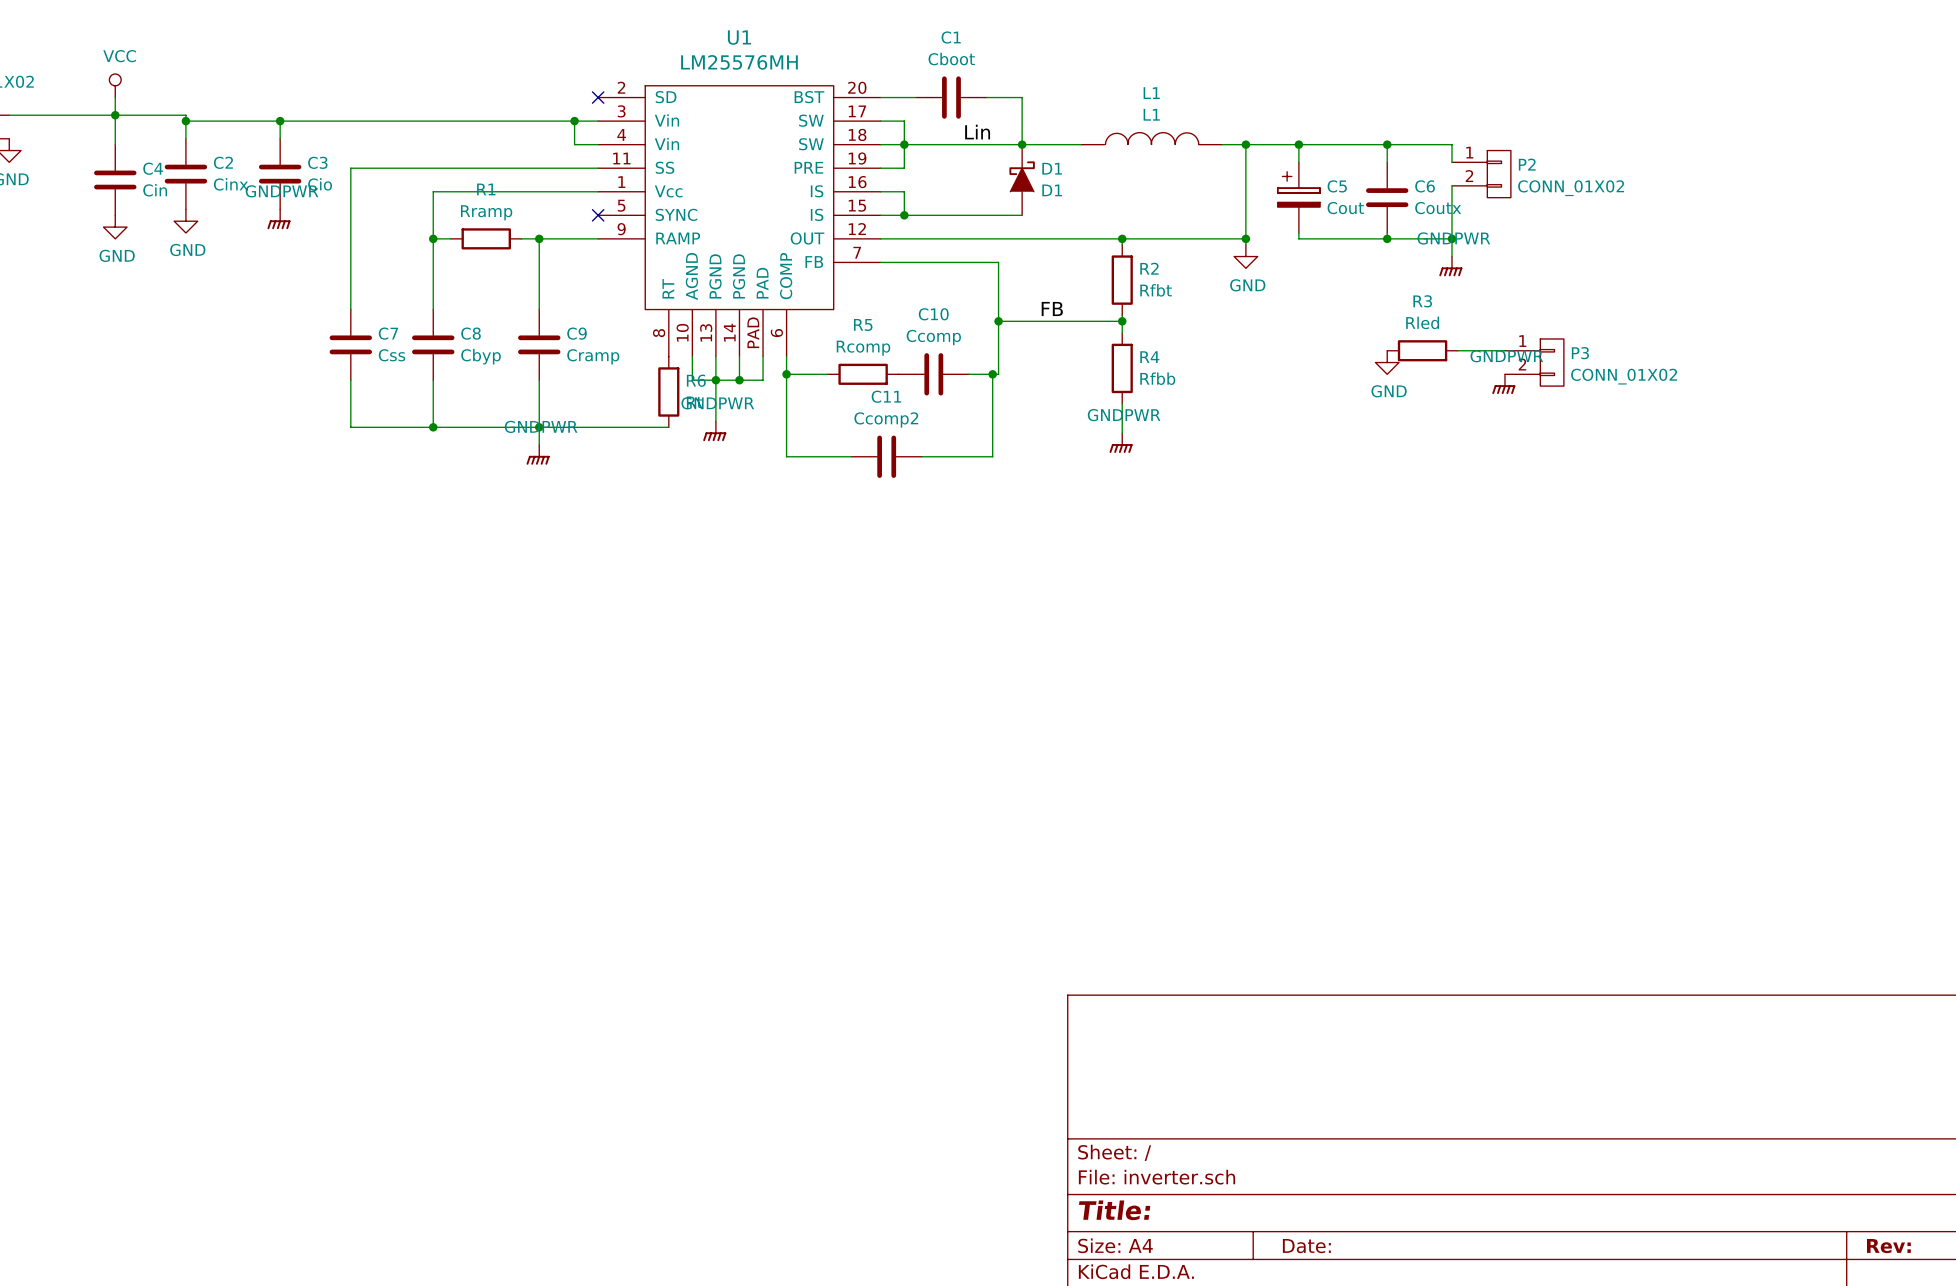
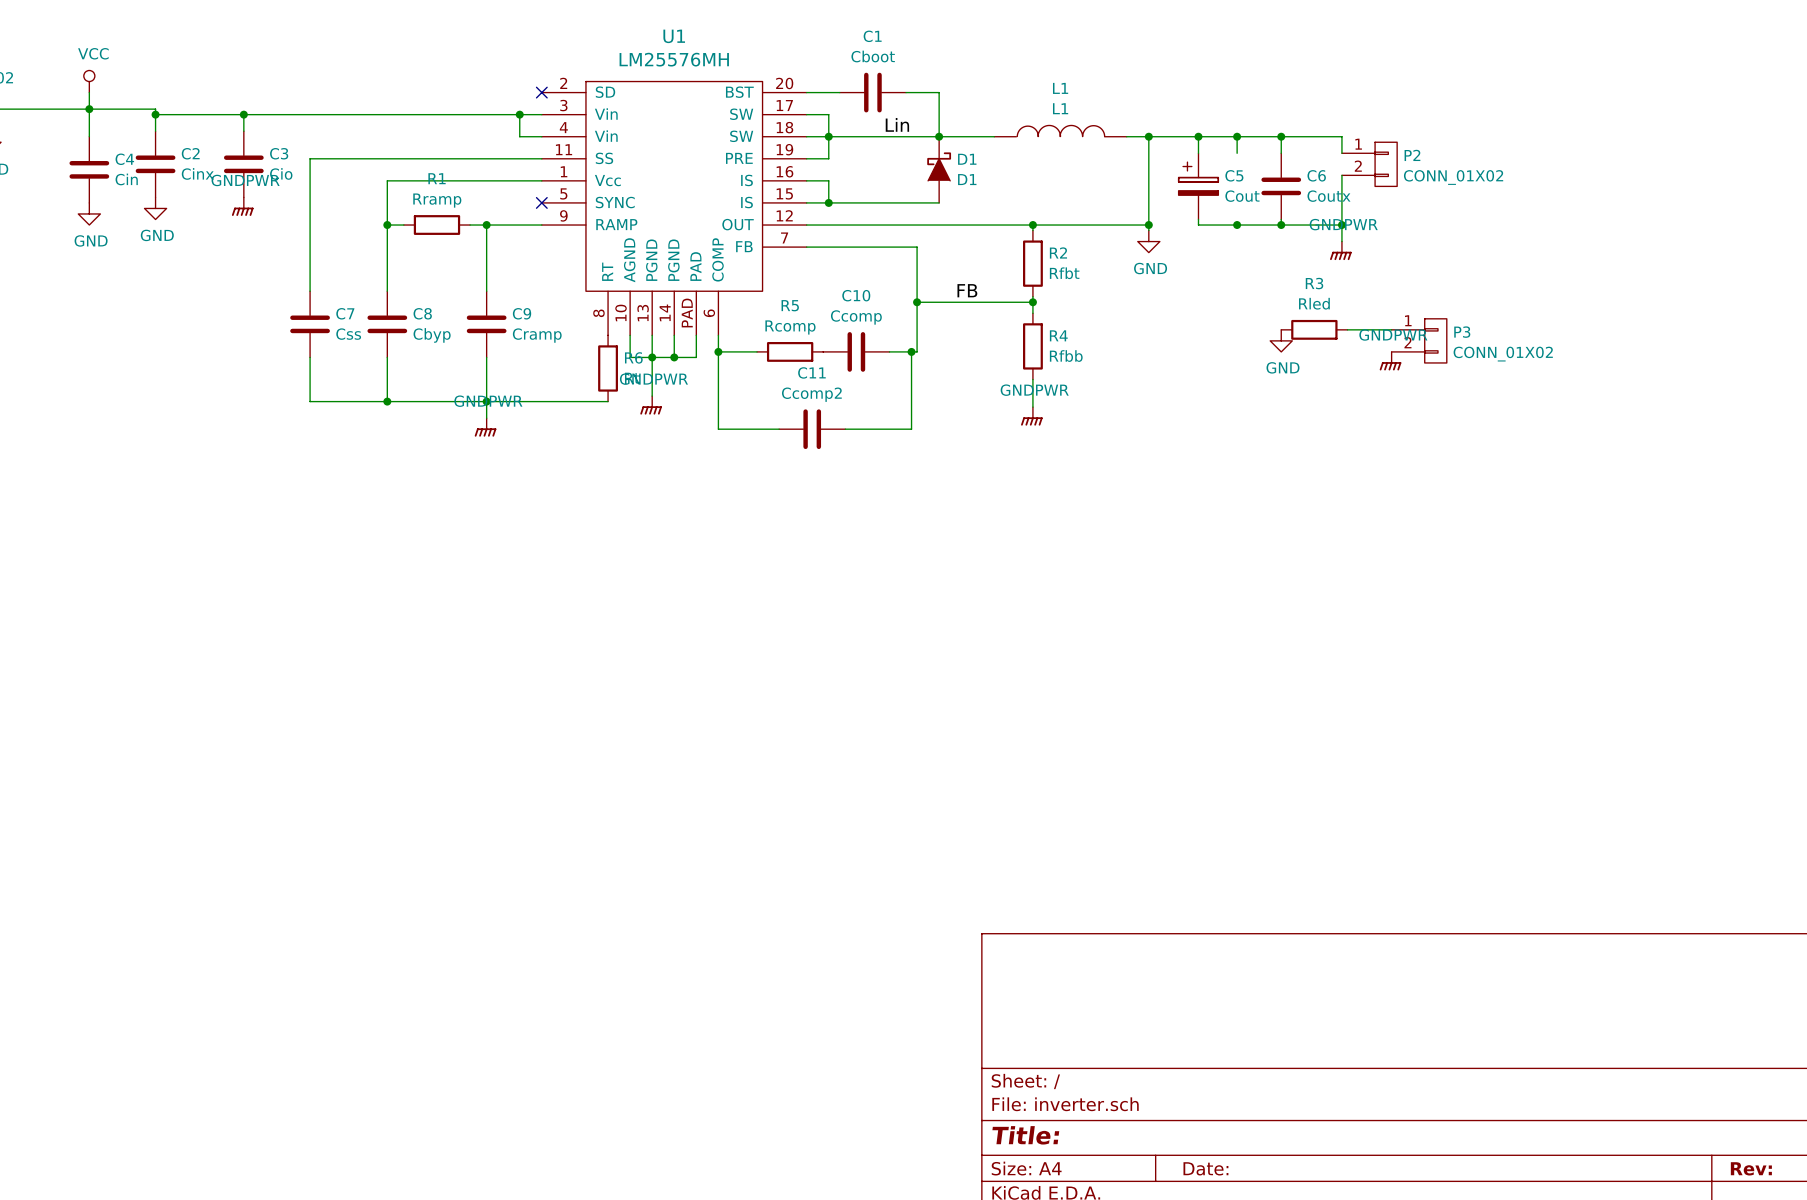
wire: none -> (1237, 136) (1237, 153)
junction: none -> (1237, 136)
junction: none -> (1237, 225)

